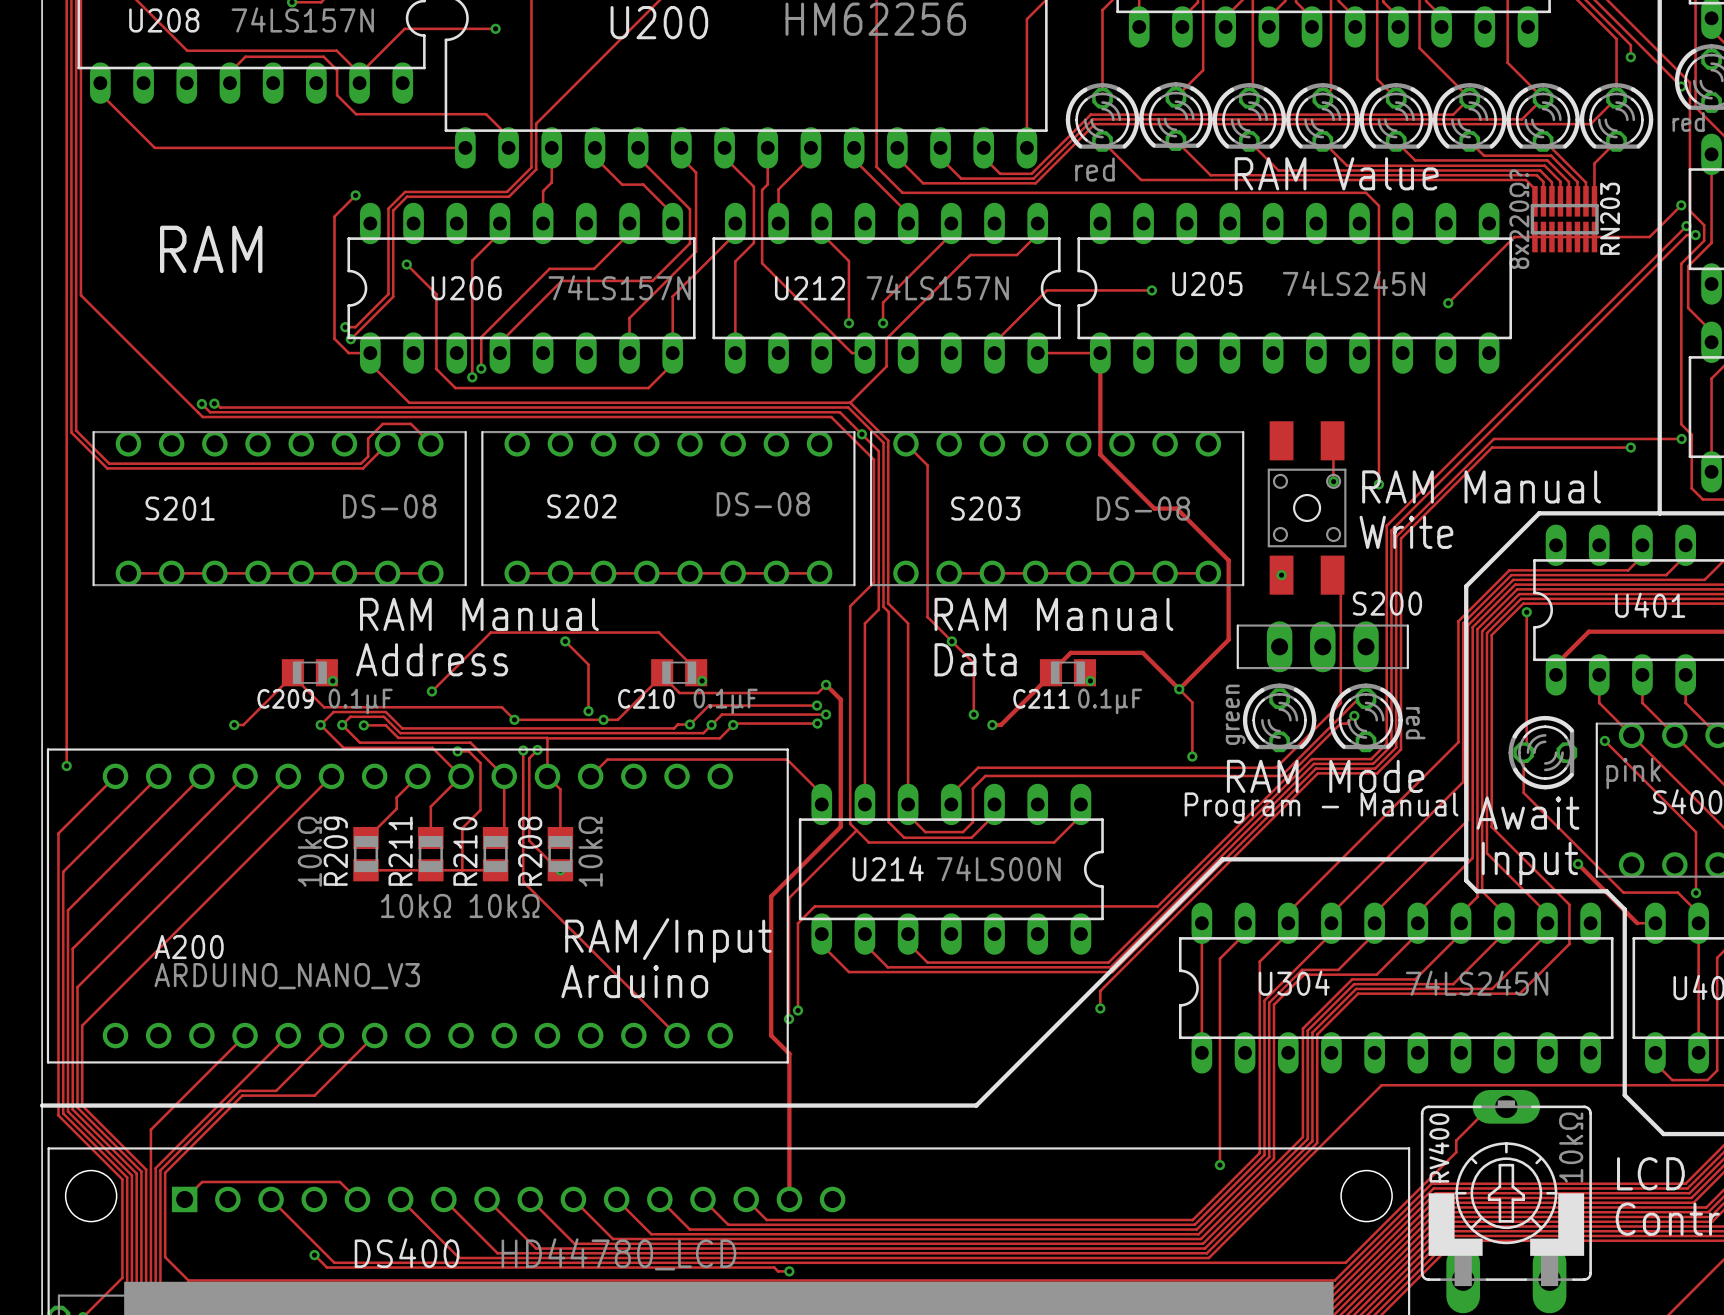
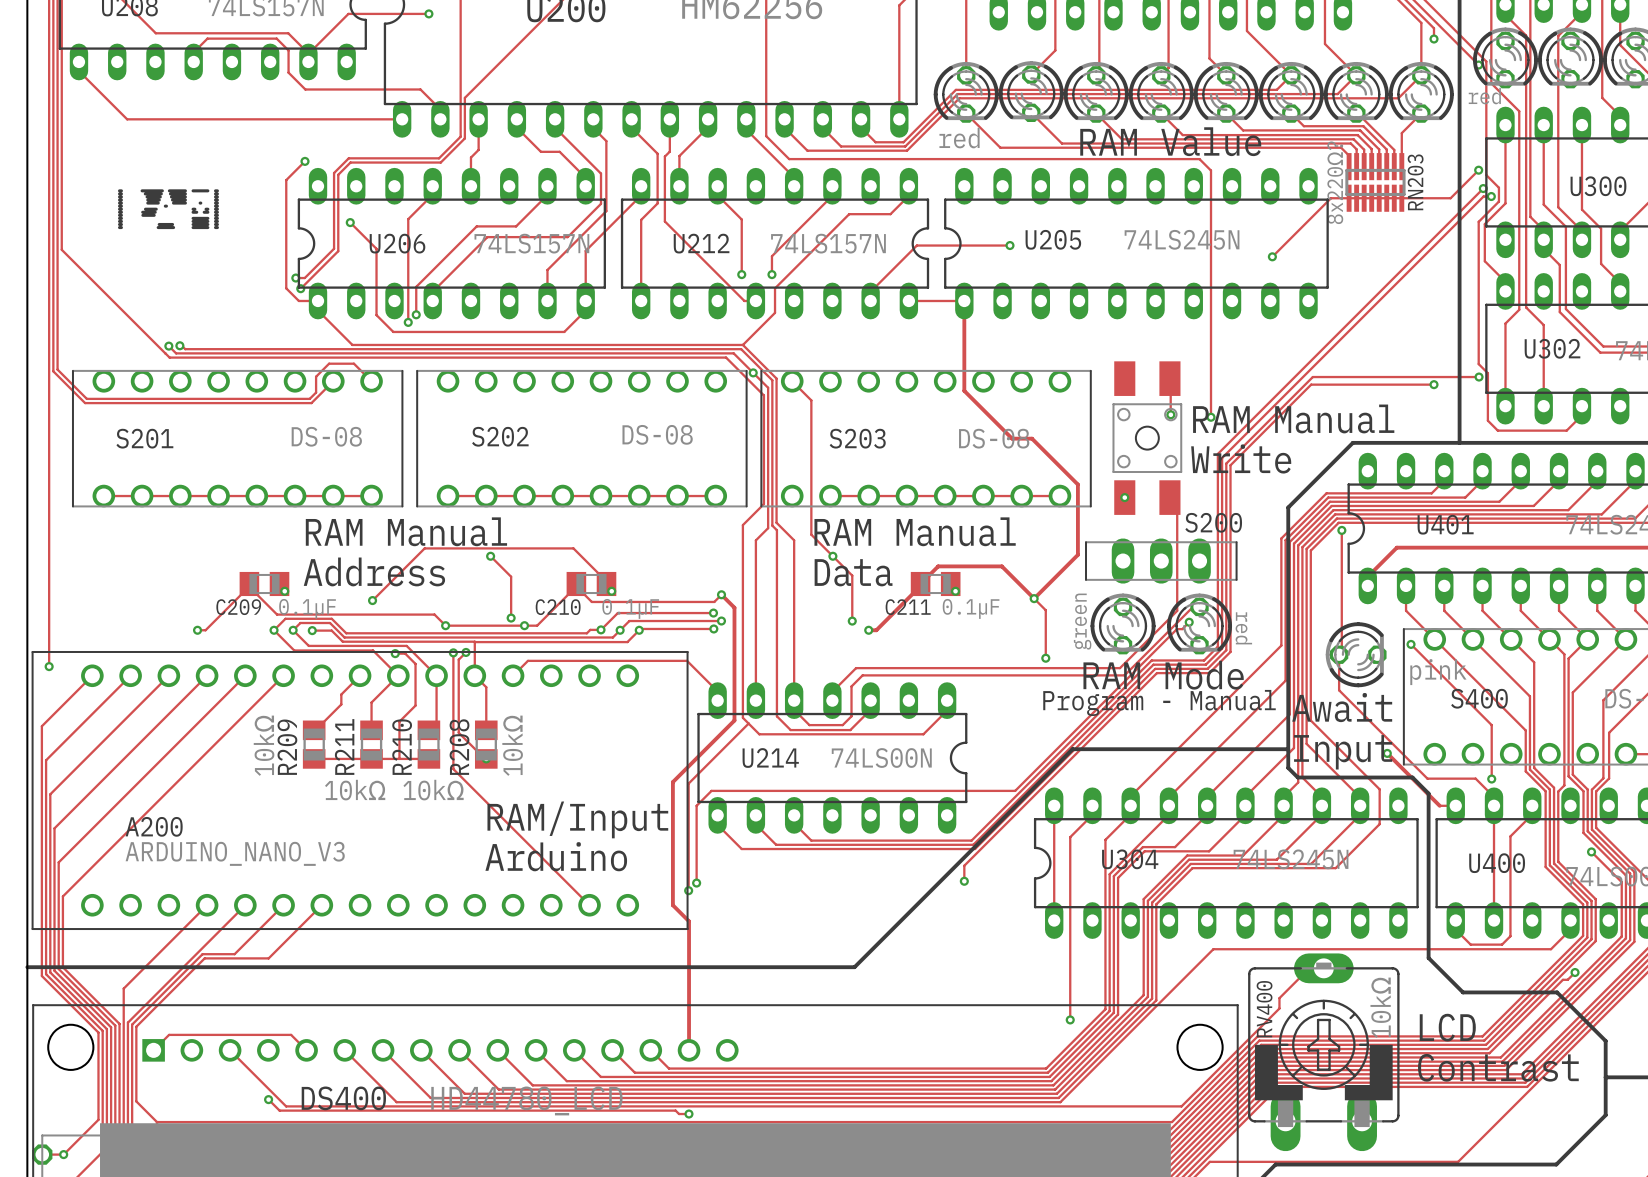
line: none -> (119, 190) (121, 190)
line: none -> (142, 190) (162, 190)
line: none -> (169, 190) (185, 190)
line: none -> (193, 190) (207, 190)
line: none -> (215, 190) (217, 190)
line: none -> (119, 193) (121, 193)
line: none -> (145, 193) (161, 193)
line: none -> (170, 193) (185, 193)
line: none -> (215, 193) (217, 193)
line: none -> (119, 196) (121, 196)
line: none -> (147, 196) (160, 196)
line: none -> (171, 196) (185, 196)
line: none -> (215, 196) (217, 196)
line: none -> (119, 200) (121, 200)
line: none -> (147, 200) (159, 200)
line: none -> (172, 200) (185, 200)
line: none -> (215, 200) (217, 200)
line: none -> (119, 203) (121, 203)
line: none -> (147, 203) (158, 203)
line: none -> (173, 203) (185, 203)
line: none -> (200, 203) (200, 203)
line: none -> (215, 203) (217, 203)
line: none -> (119, 206) (121, 206)
line: none -> (165, 206) (166, 206)
line: none -> (215, 206) (217, 206)
line: none -> (119, 209) (121, 209)
line: none -> (145, 209) (156, 209)
text: RAM (211, 249) -> none
line: none -> (193, 209) (194, 209)
line: none -> (206, 209) (207, 209)
line: none -> (215, 209) (217, 209)
line: none -> (119, 212) (121, 212)
line: none -> (142, 212) (155, 212)
line: none -> (193, 212) (196, 212)
line: none -> (204, 212) (207, 212)
line: none -> (215, 212) (217, 212)
line: none -> (119, 215) (121, 215)
line: none -> (142, 215) (154, 215)
line: none -> (215, 215) (217, 215)
line: none -> (119, 218) (121, 218)
line: none -> (193, 218) (207, 218)
line: none -> (215, 218) (217, 218)
line: none -> (119, 221) (121, 221)
line: none -> (193, 221) (207, 221)
line: none -> (215, 221) (217, 221)
line: none -> (119, 224) (121, 224)
line: none -> (159, 224) (172, 224)
line: none -> (193, 224) (207, 224)
line: none -> (215, 224) (217, 224)
line: none -> (119, 227) (121, 227)
line: none -> (158, 227) (173, 227)
line: none -> (193, 227) (207, 227)
line: none -> (215, 227) (217, 227)

